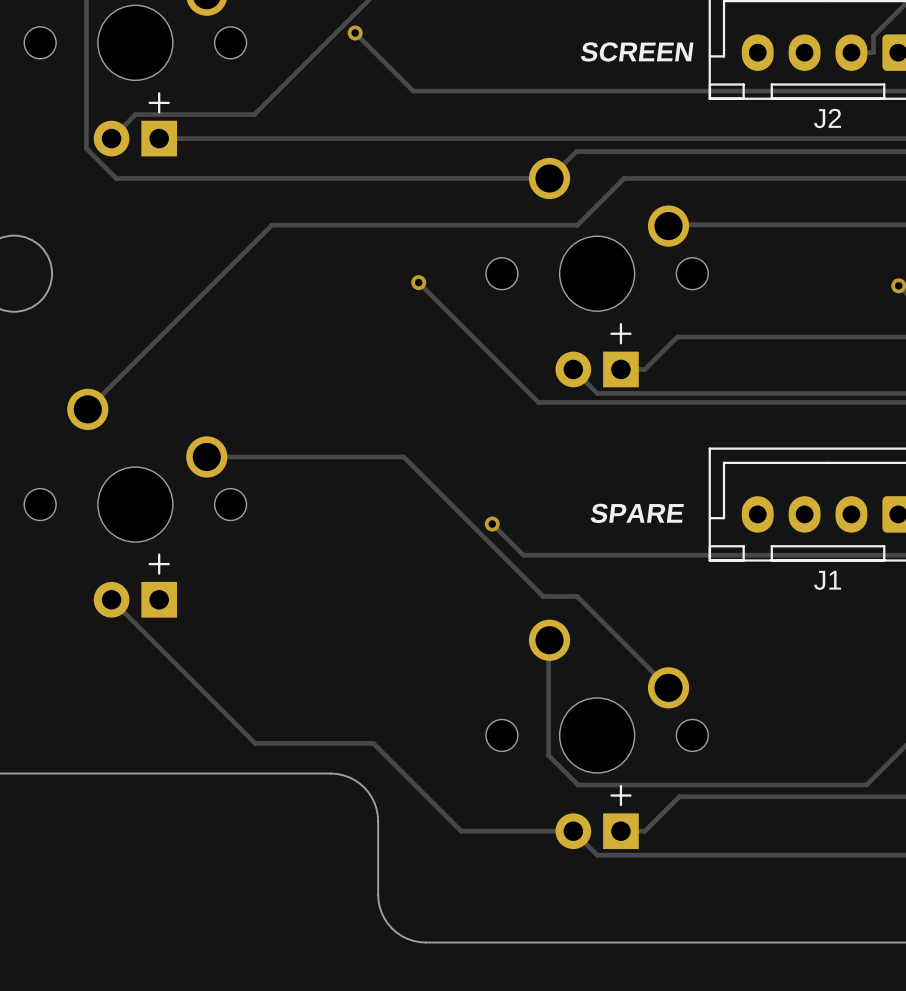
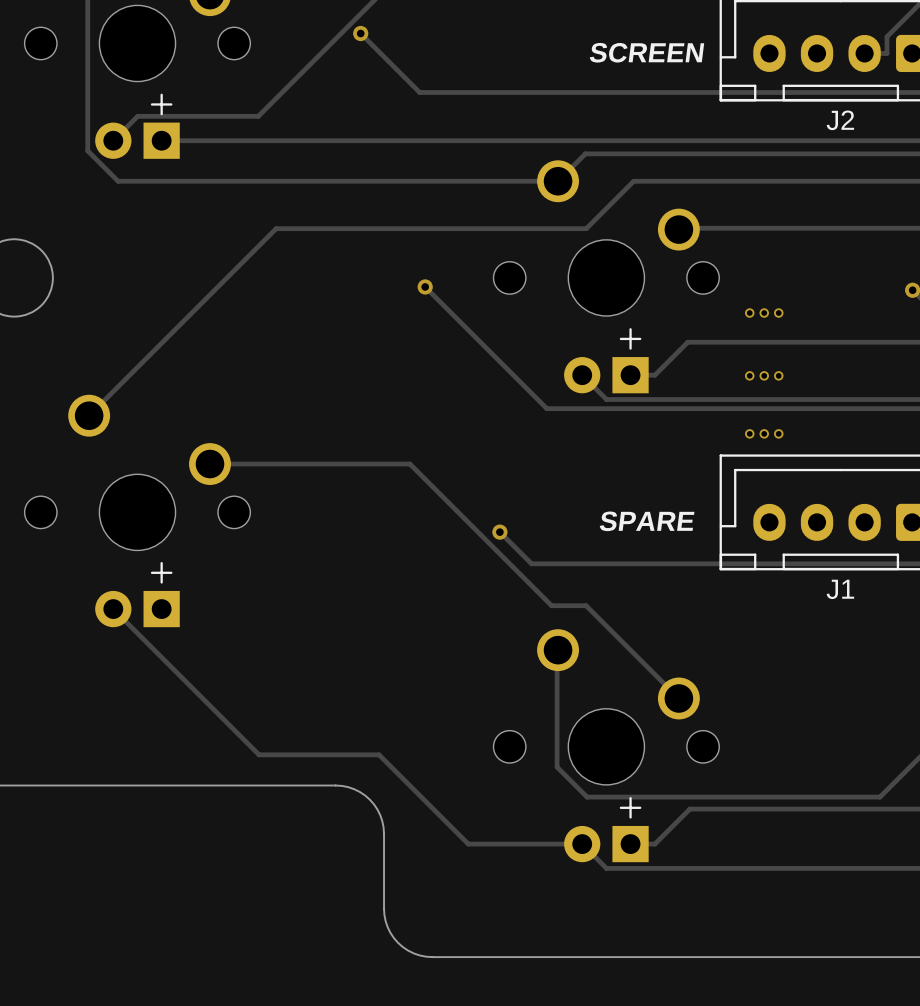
via: none -> (749, 313)
via: none -> (764, 313)
via: none -> (778, 313)
via: none -> (749, 375)
via: none -> (764, 375)
via: none -> (778, 375)
via: none -> (749, 433)
via: none -> (764, 433)
via: none -> (778, 433)

